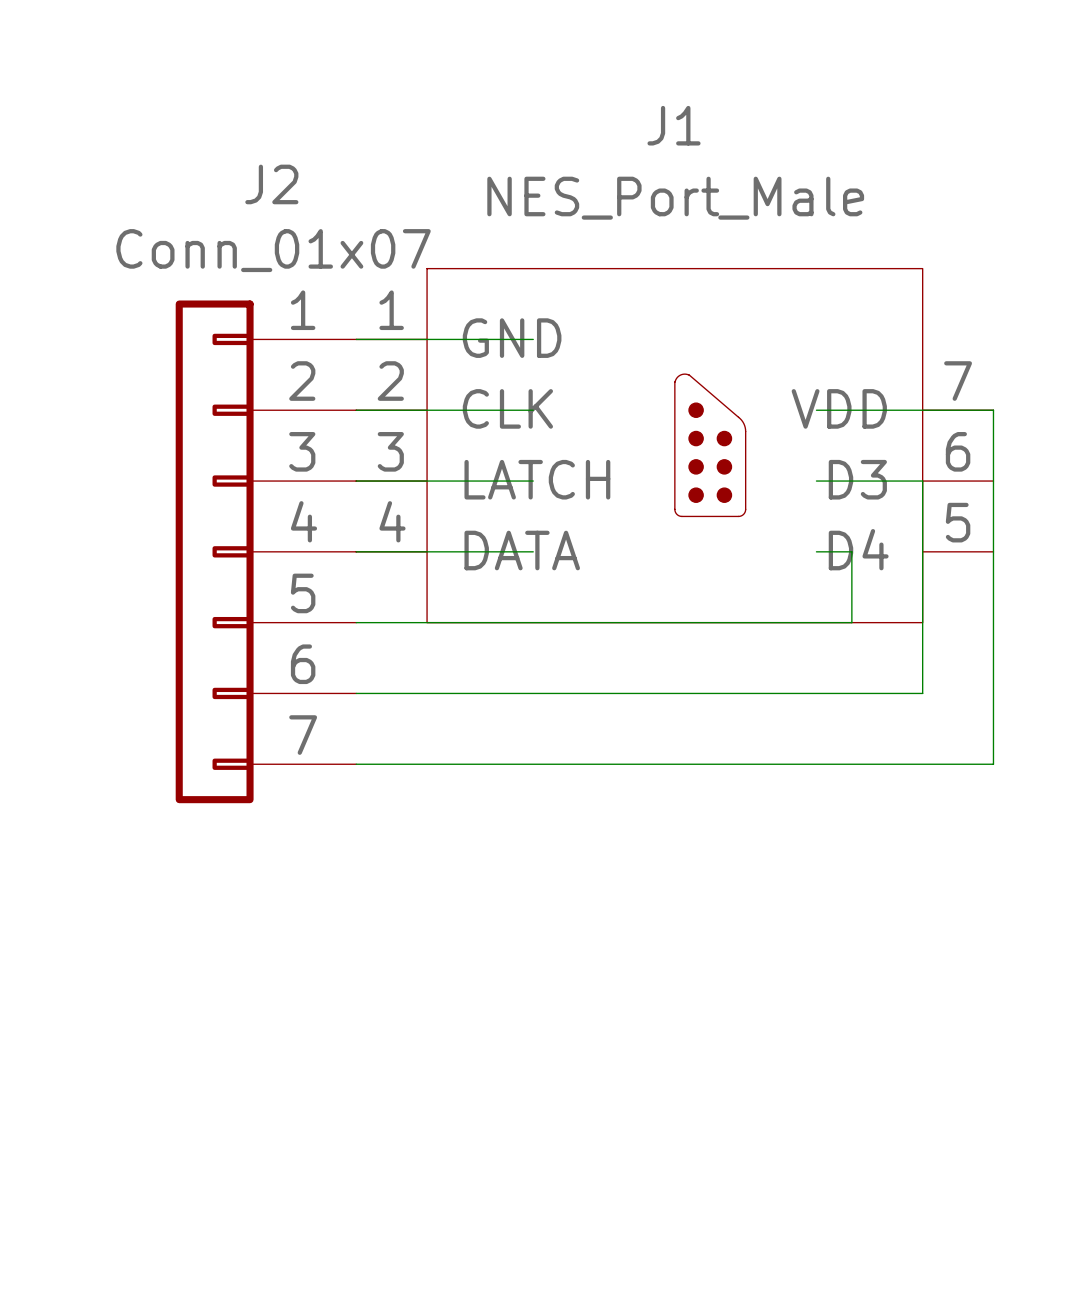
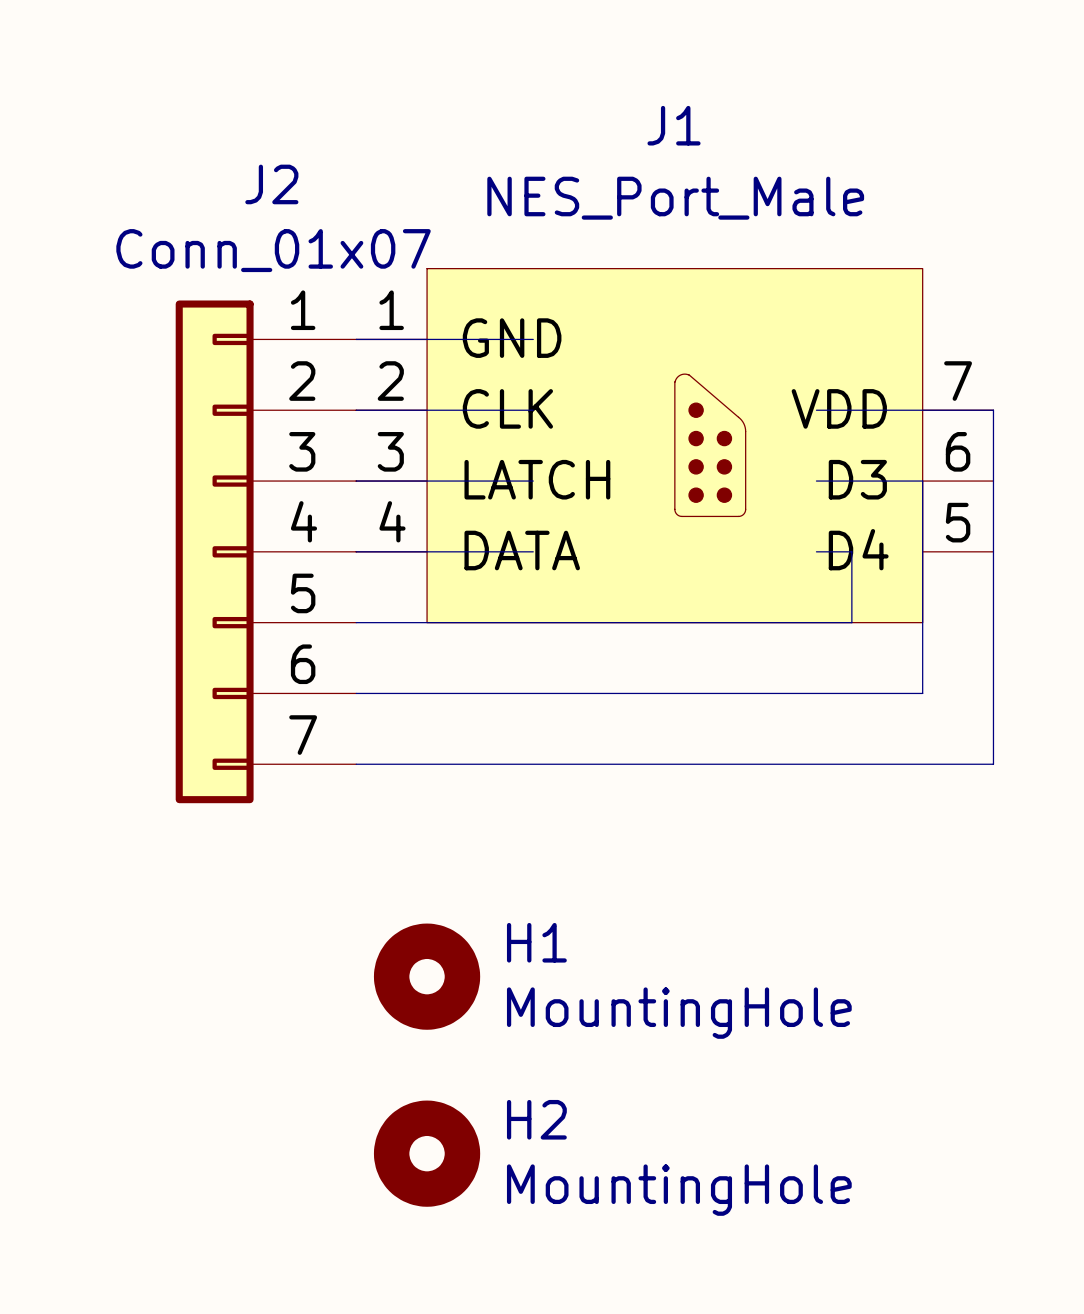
H1: none -> MountingHole (427, 976)
H2: none -> MountingHole (427, 1153)

